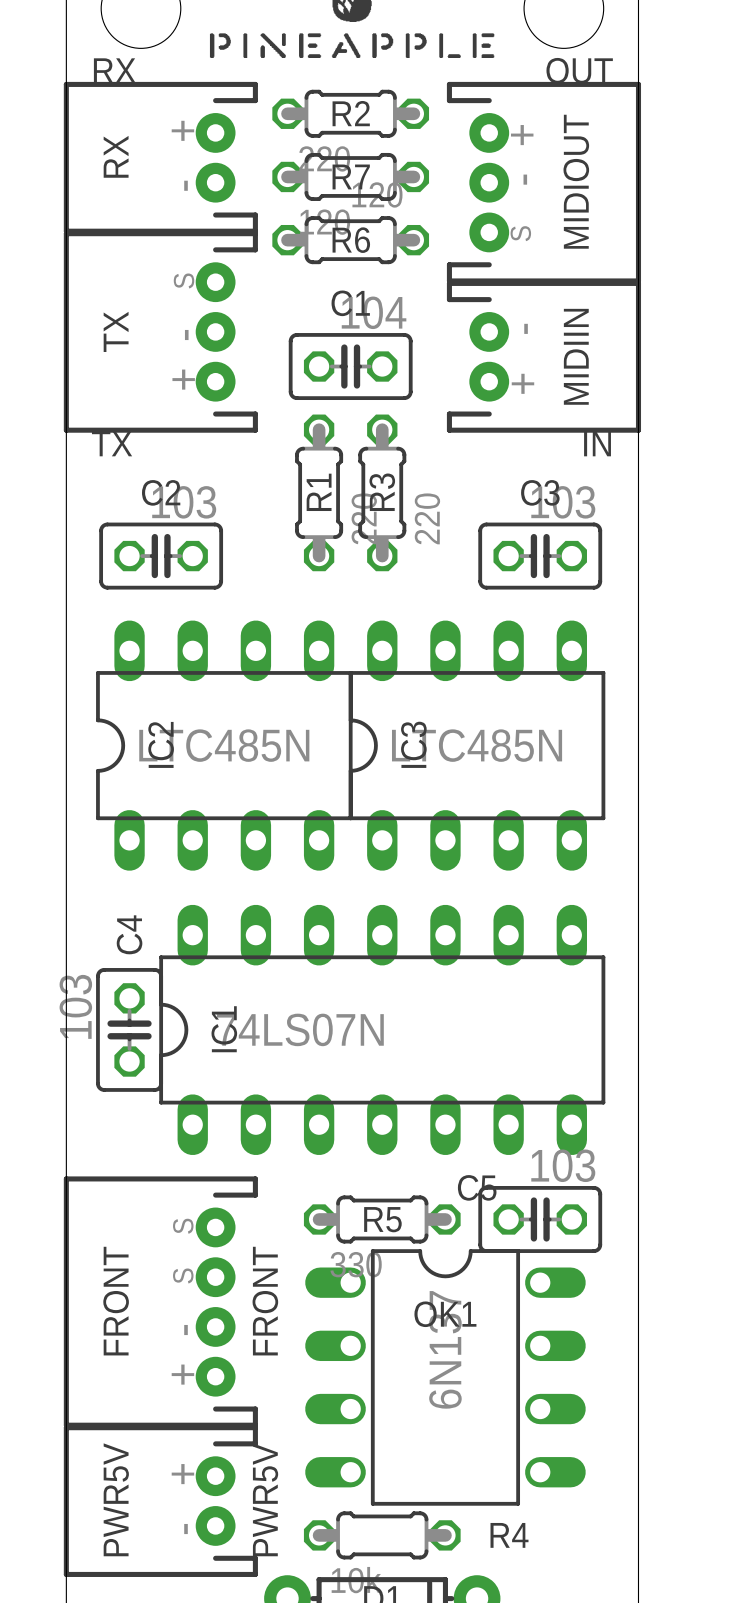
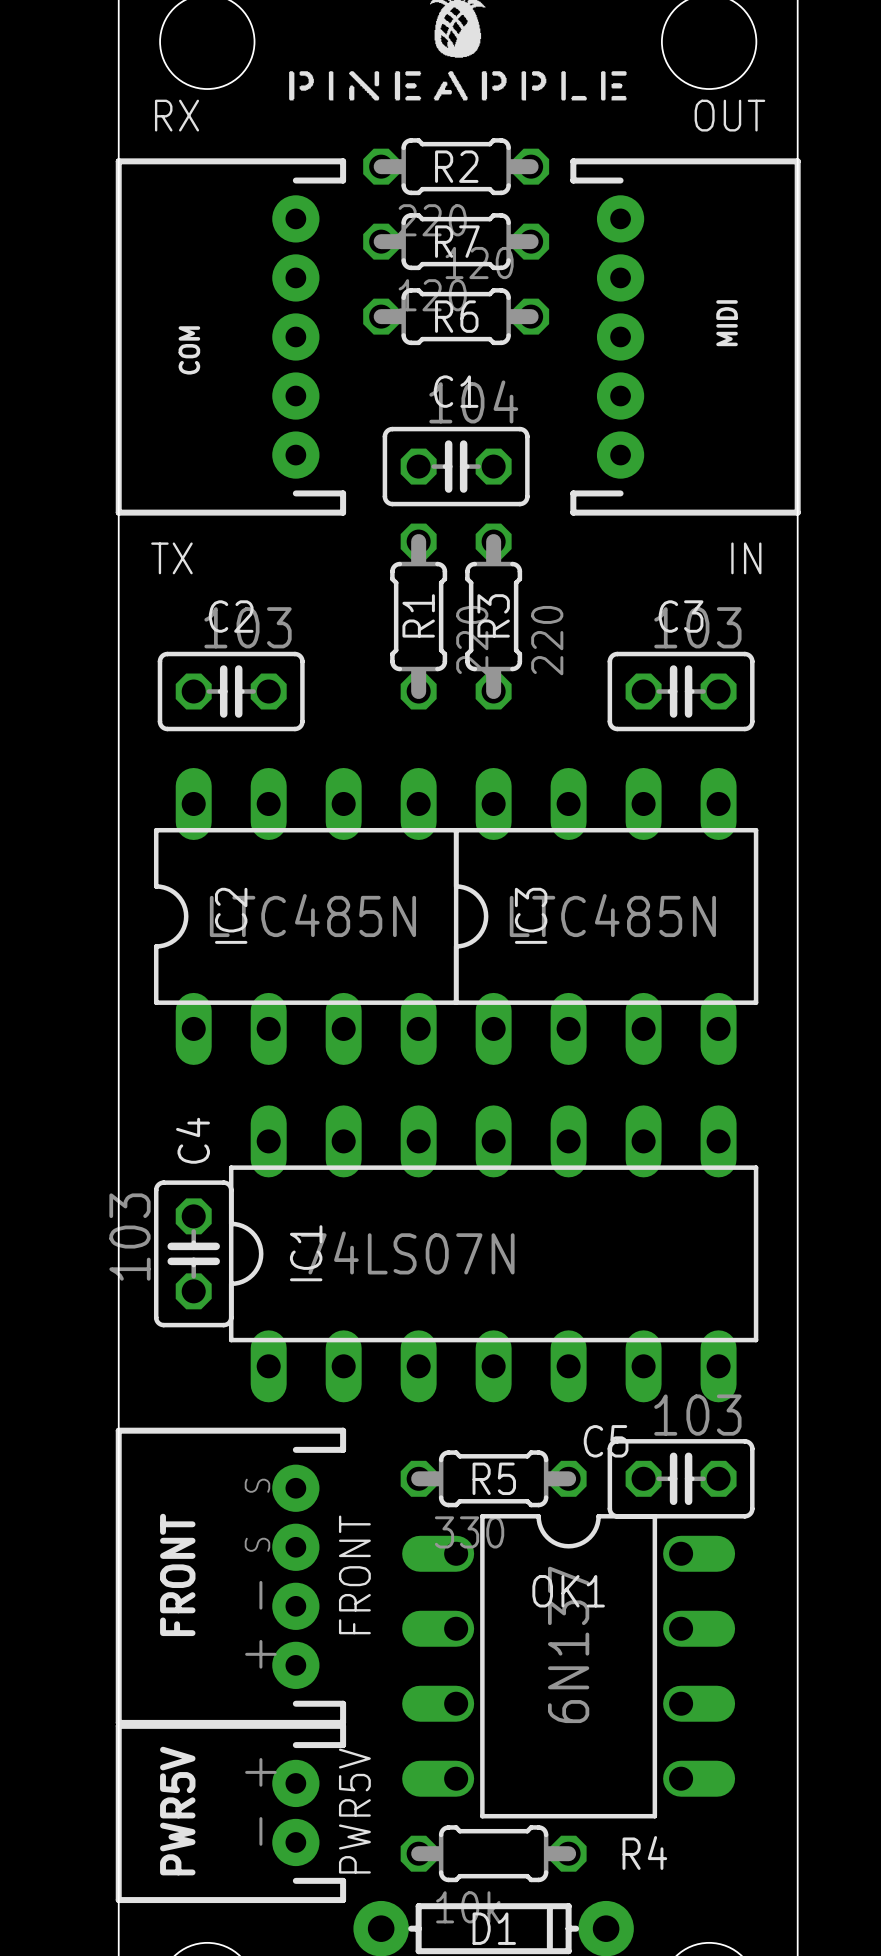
RX: (160, 157) -> none
MIDIOUT: (543, 182) -> none
COM: none -> (230, 336)
MIDI: none -> (685, 336)
TX: (160, 331) -> none
MIDIIN: (543, 356) -> none

